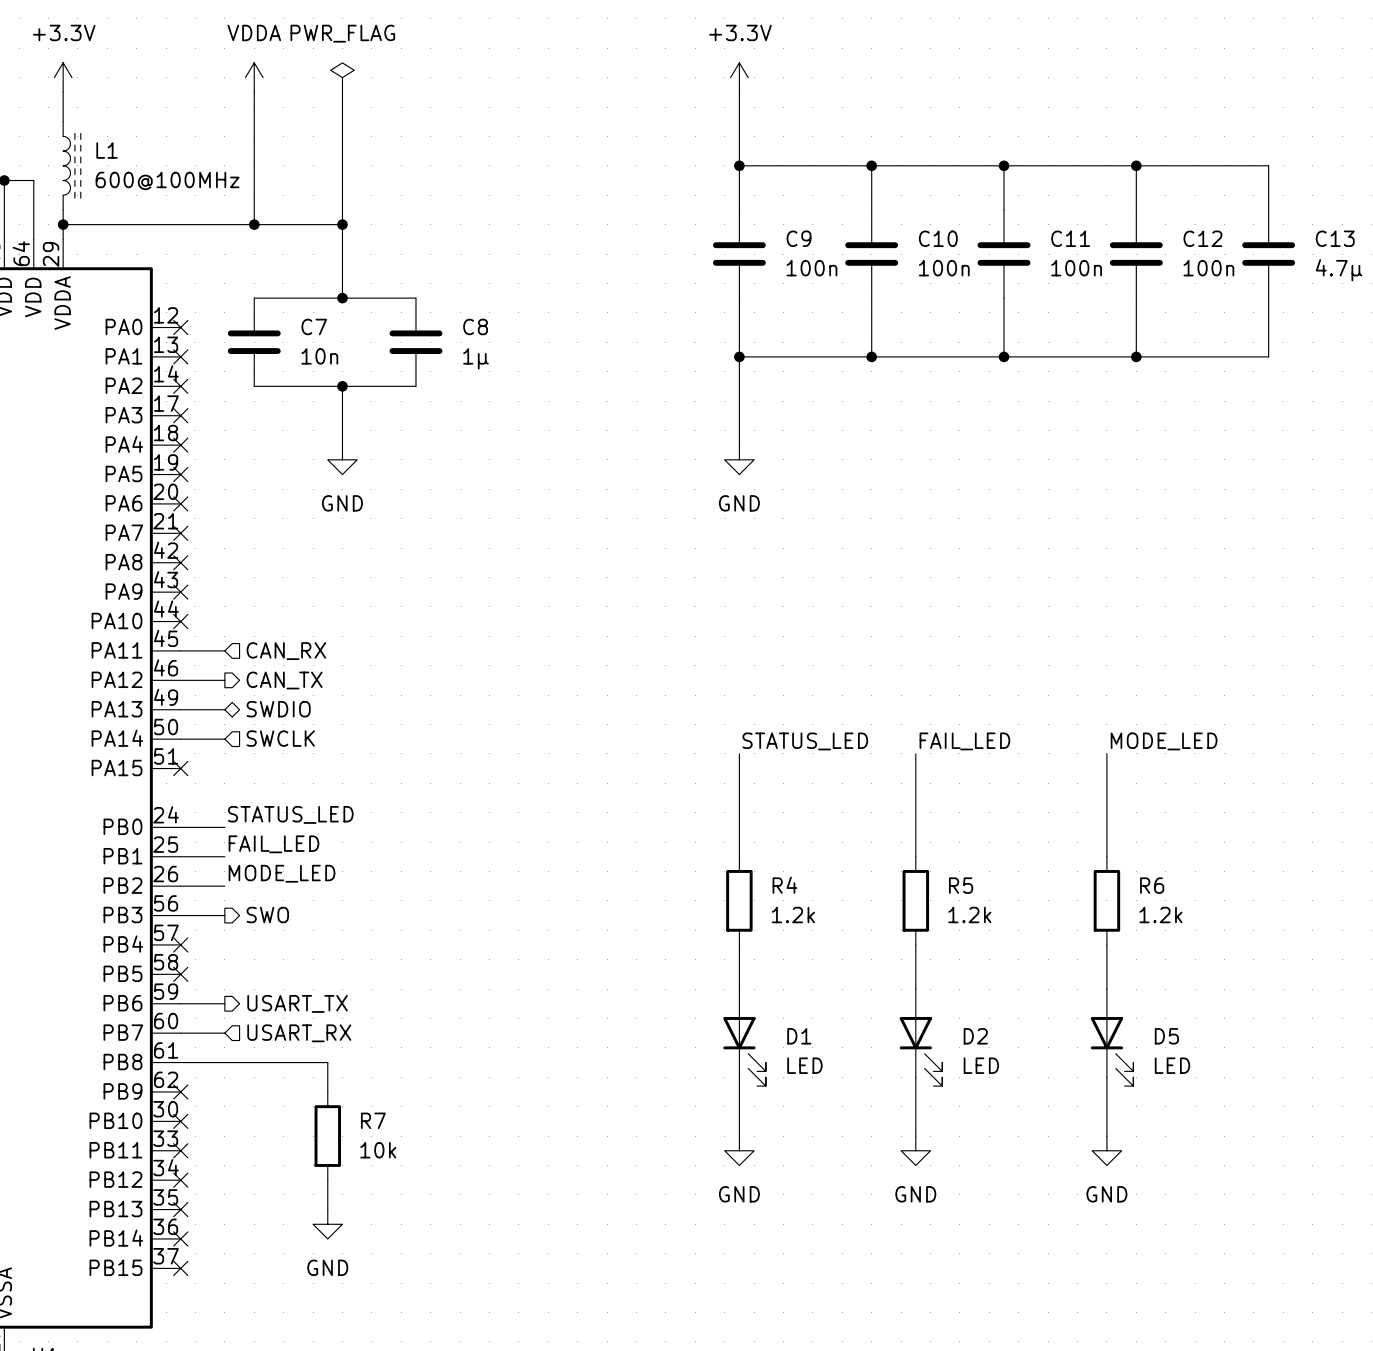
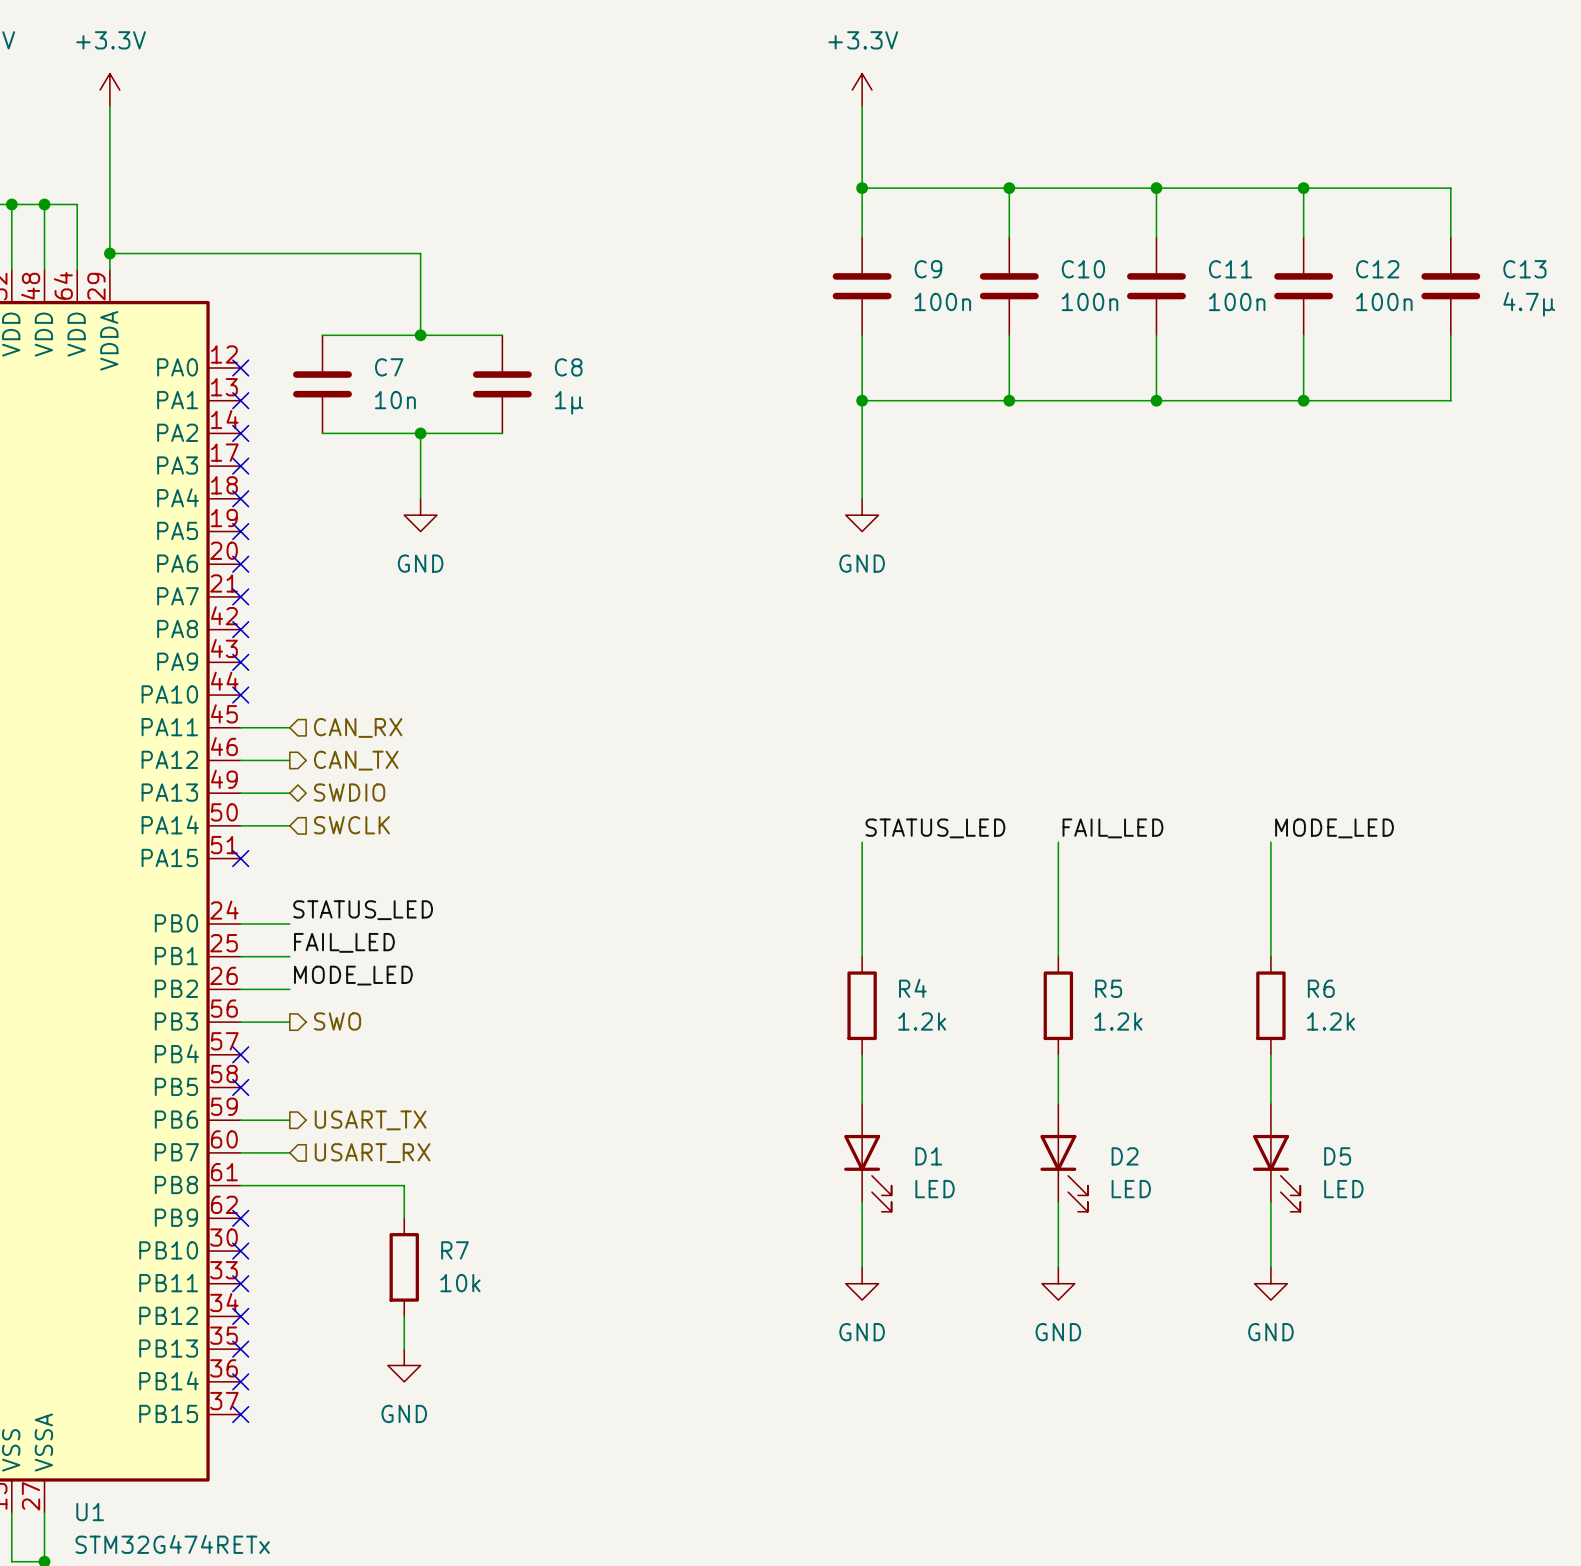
power symbol: VDDA (254, 77) -> none
power symbol: PWR_FLAG (342, 77) -> none
wire: (254, 92) (254, 224) -> none
wire: (342, 92) (342, 224) -> none
wire: none -> (109, 139) (109, 237)
L1: 600@100MHz (71, 165) -> none
junction: (254, 224) -> none
junction: (342, 224) -> none

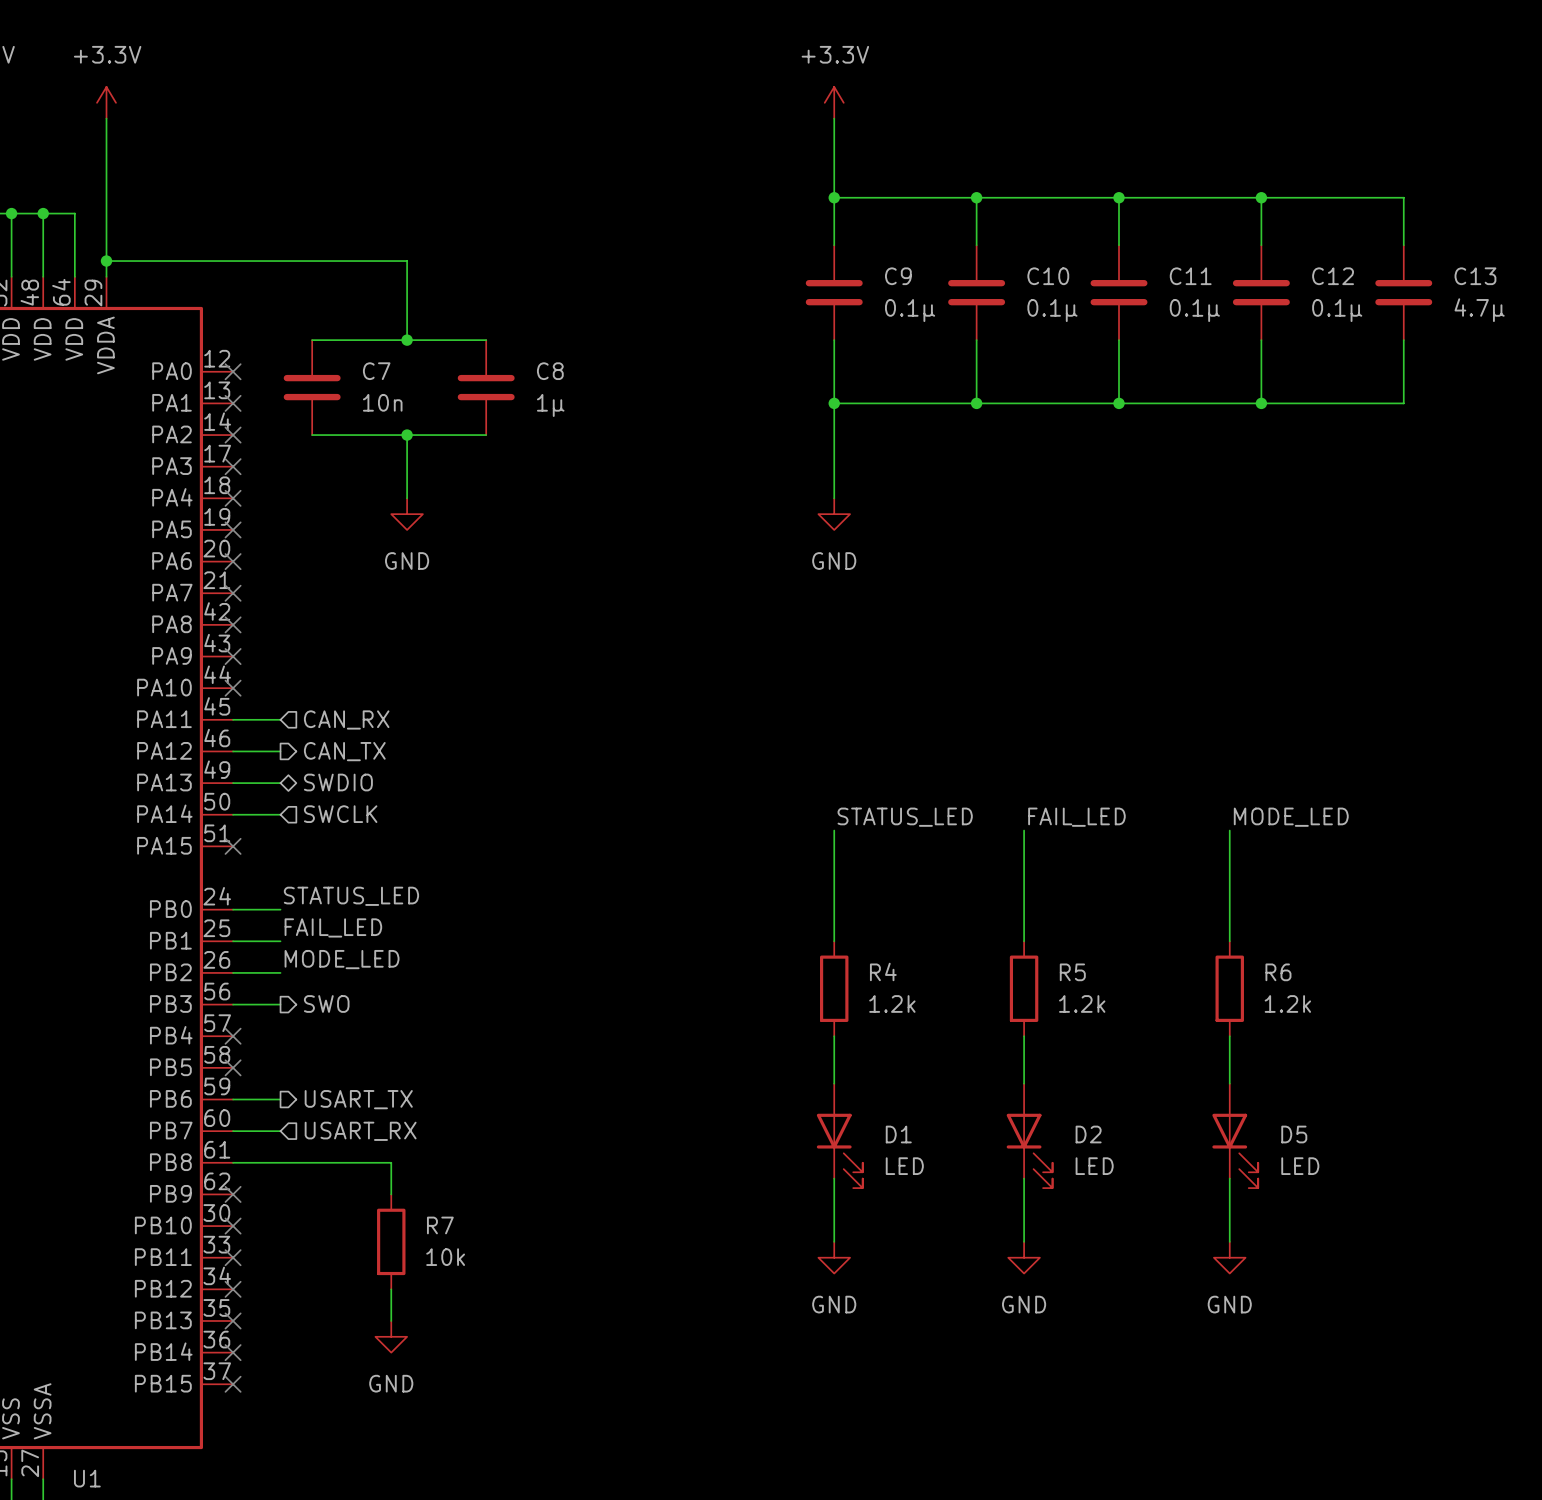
C9 value: 100n (942, 301) -> 0.1μ (910, 310)
C10 value: 100n (1090, 301) -> 0.1μ (1052, 310)
C11 value: 100n (1237, 301) -> 0.1μ (1194, 310)
C12 value: 100n (1384, 301) -> 0.1μ (1337, 310)

